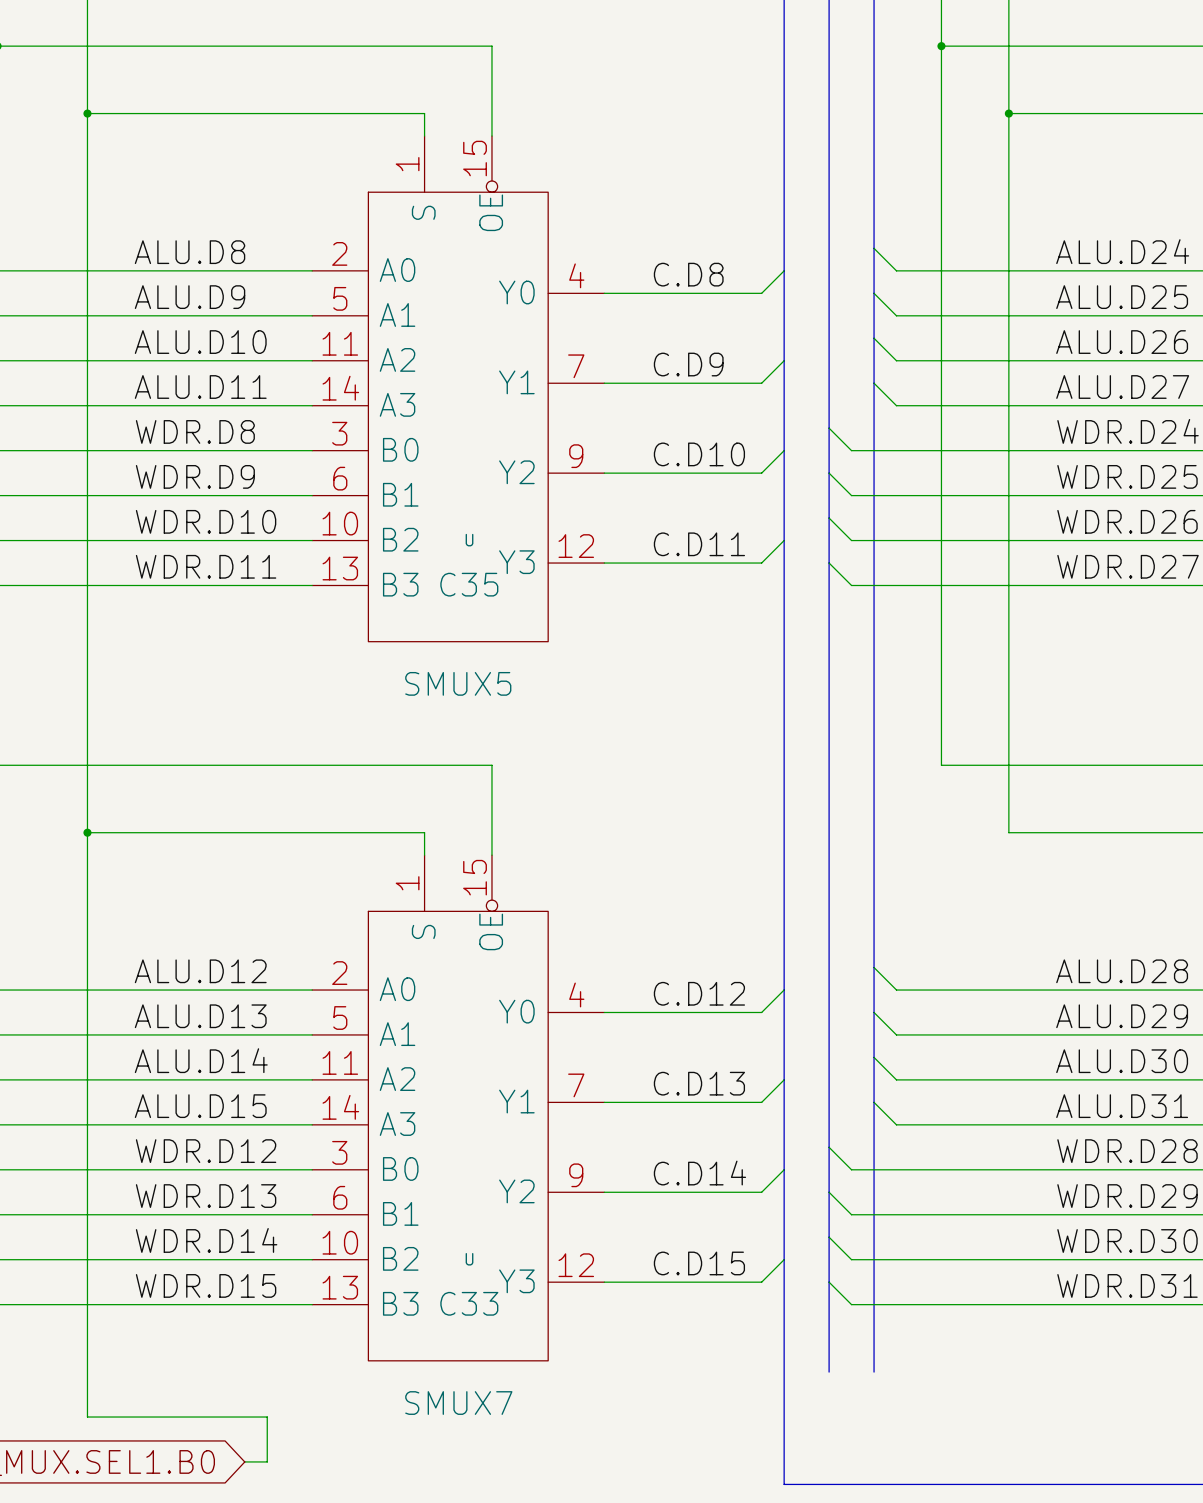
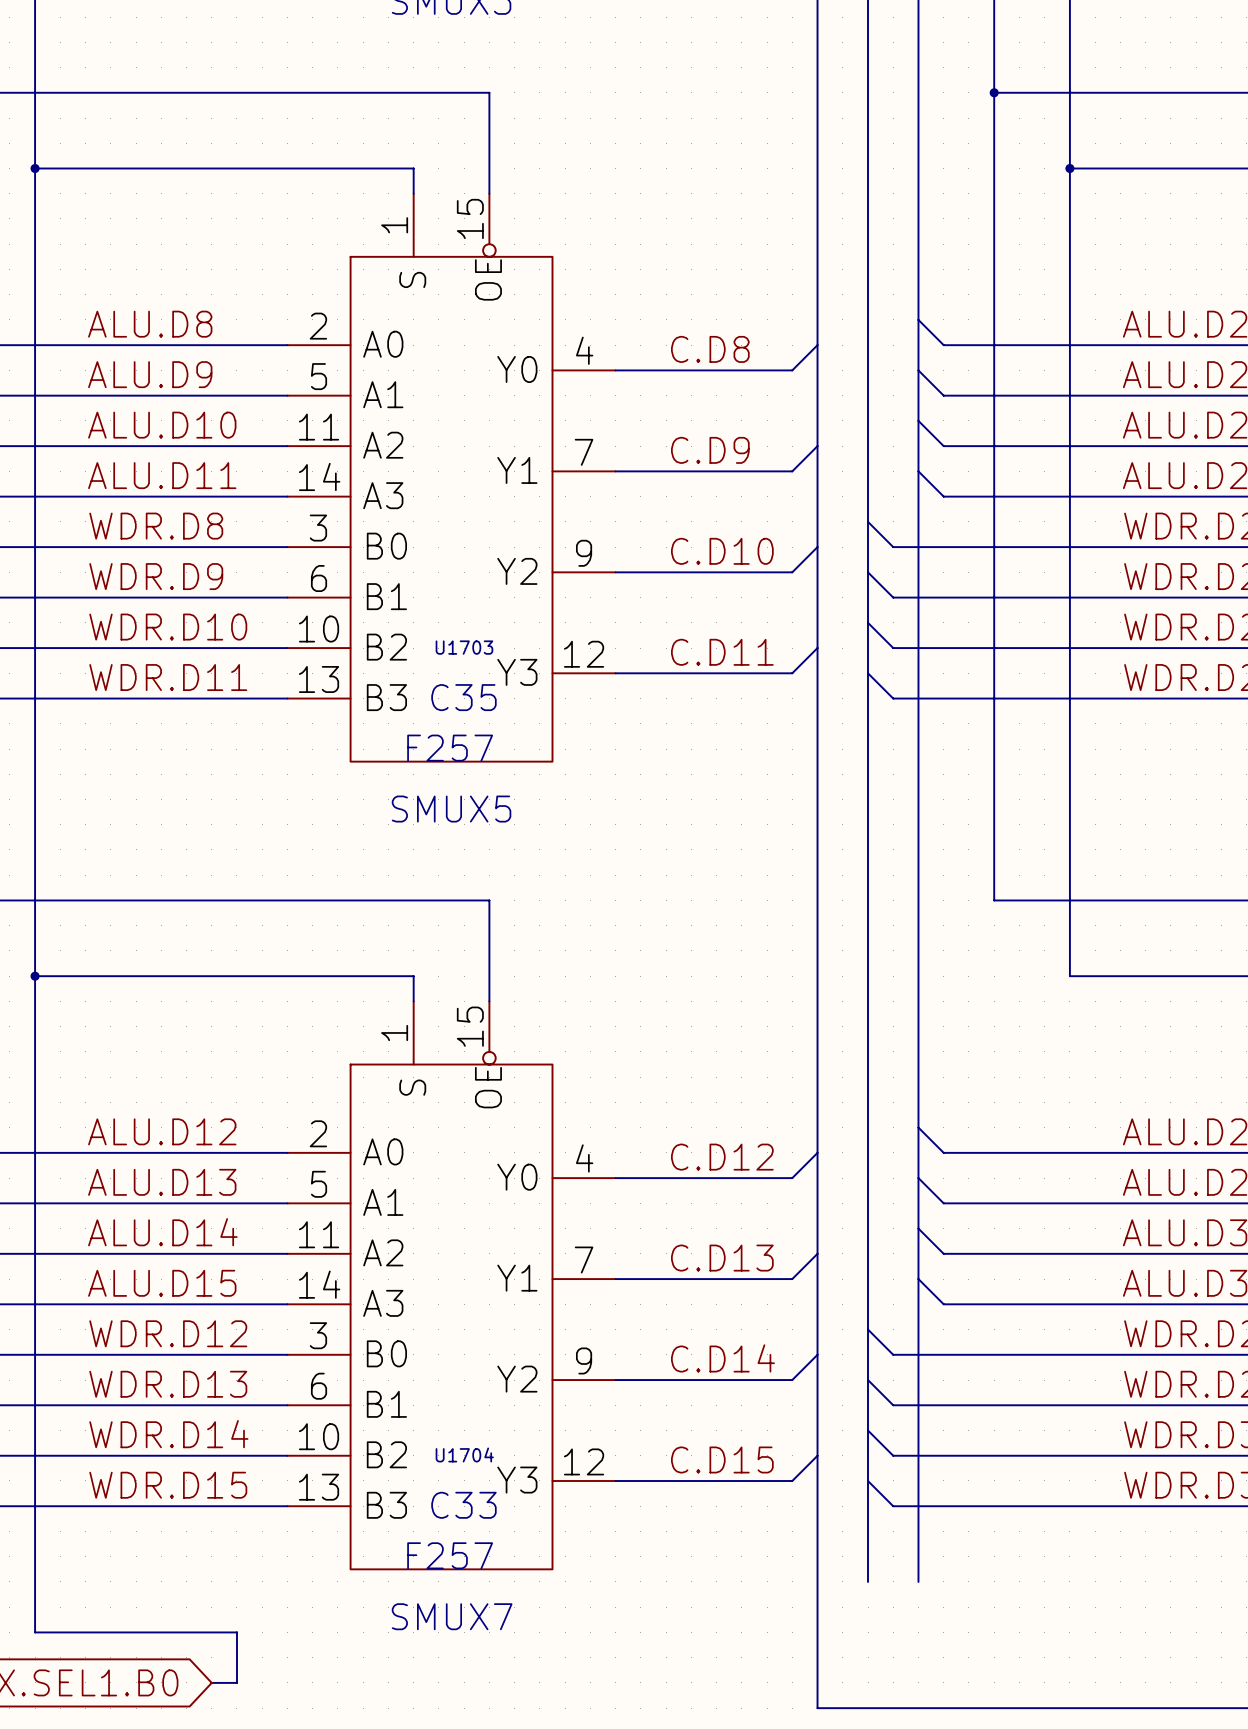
U name: U (469, 540) -> U1703 (464, 647)
U value: none -> F257 (450, 748)
U name: U (469, 1259) -> U1704 (464, 1454)
U value: none -> F257 (450, 1555)

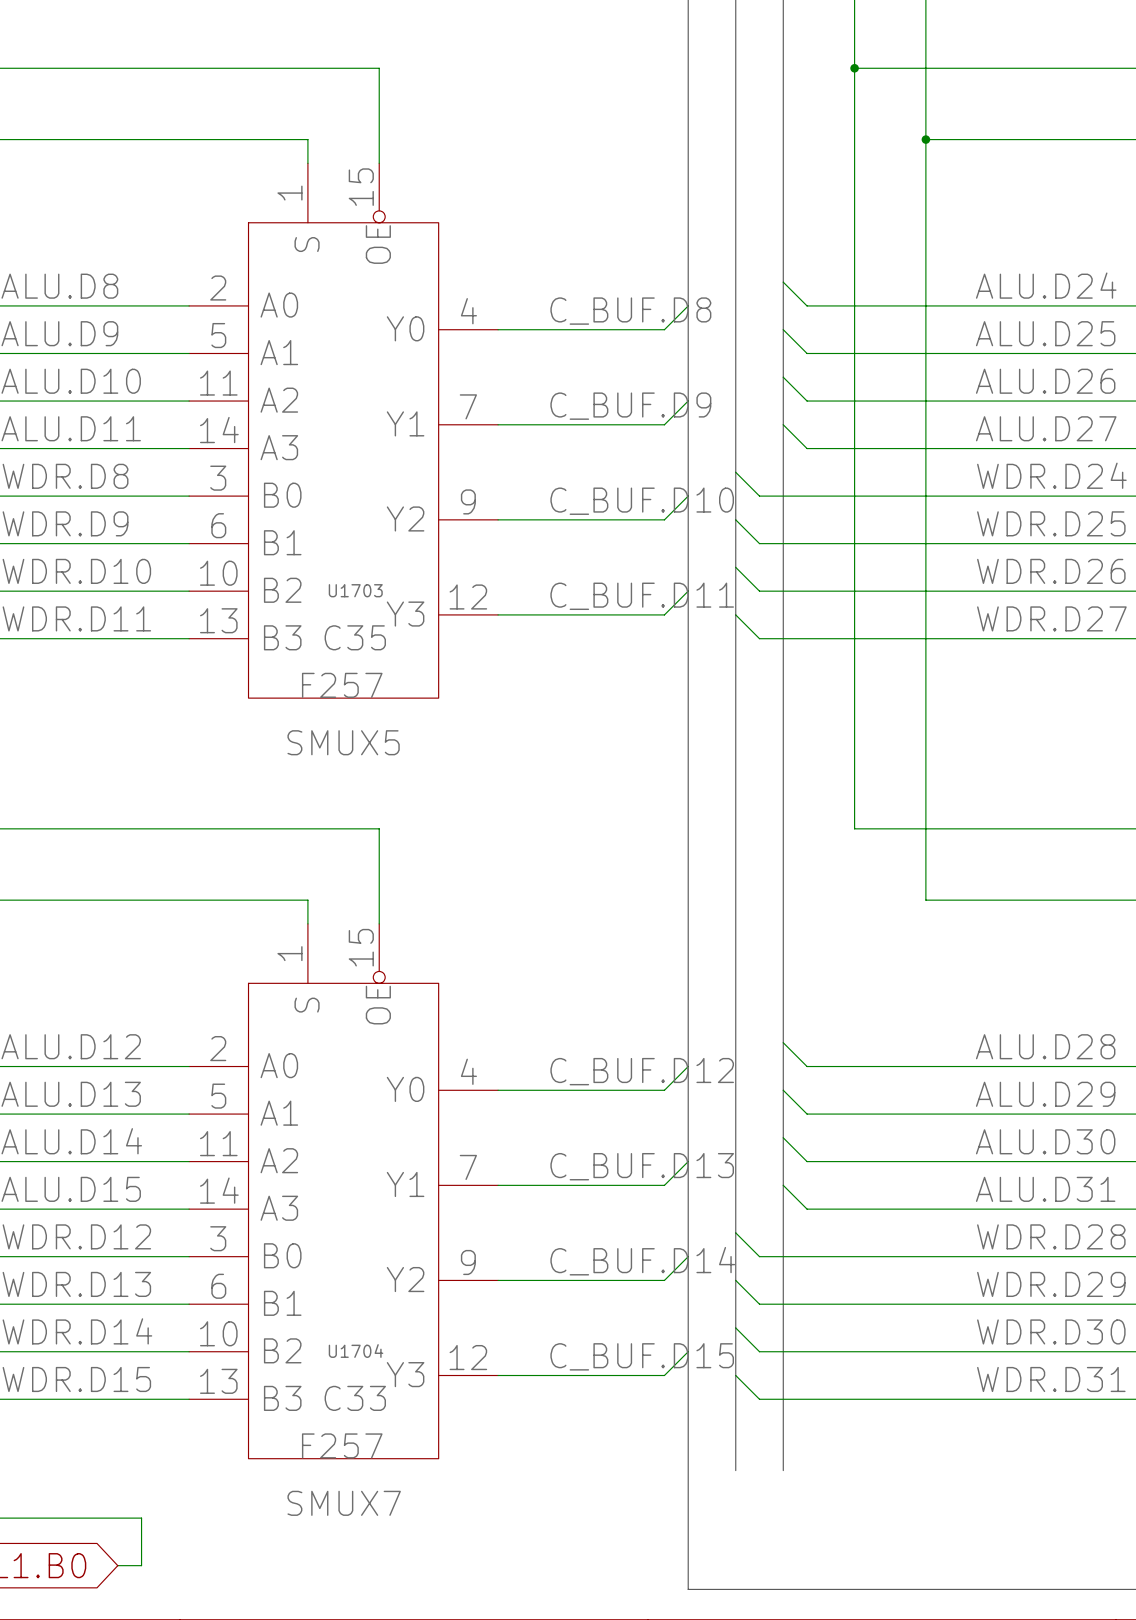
label: C.D8 (710, 349) -> C_BUF.D8 (630, 311)
label: C.D9 (710, 450) -> C_BUF.D9 (630, 406)
label: C.D10 (722, 551) -> C_BUF.D10 (642, 501)
label: C.D11 (722, 652) -> C_BUF.D11 (642, 596)
label: C.D12 (722, 1157) -> C_BUF.D12 (642, 1071)
label: C.D13 (722, 1258) -> C_BUF.D13 (642, 1166)
label: C.D14 (722, 1358) -> C_BUF.D14 (642, 1261)
label: C.D15 (722, 1459) -> C_BUF.D15 (642, 1356)

